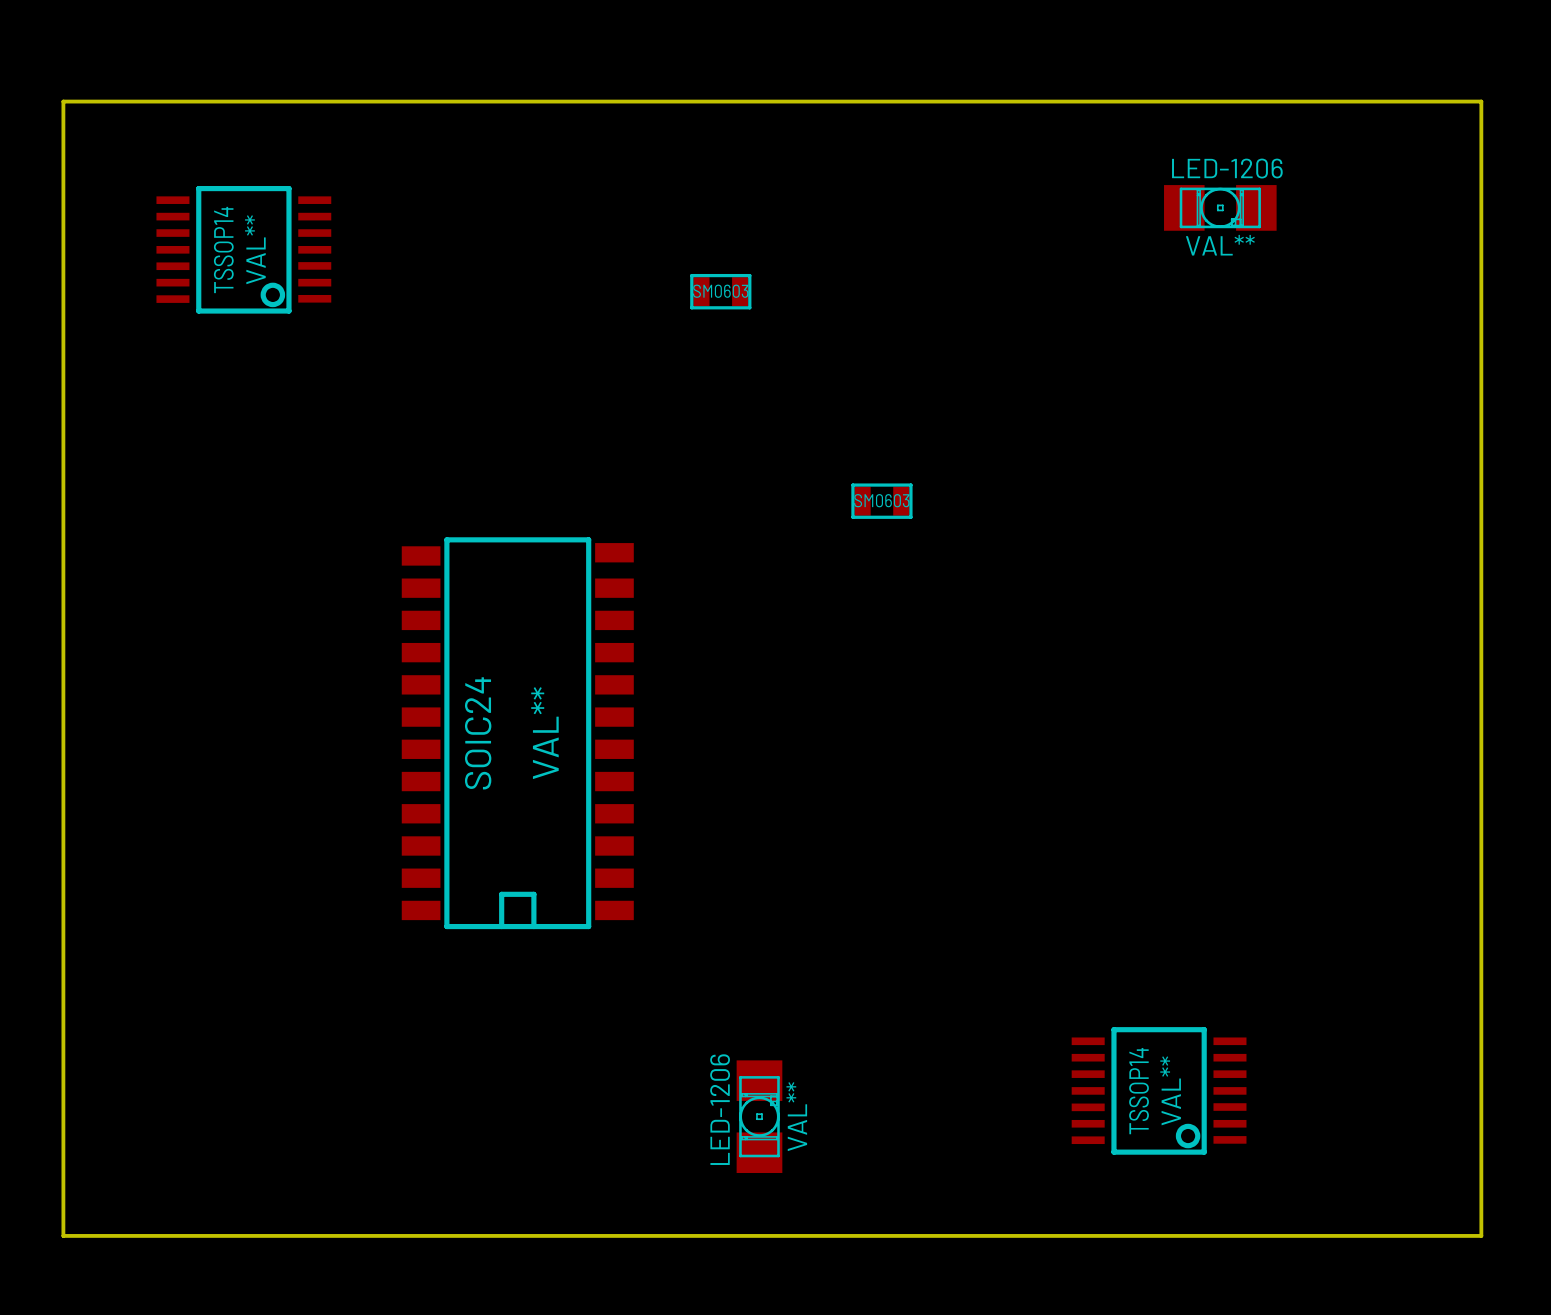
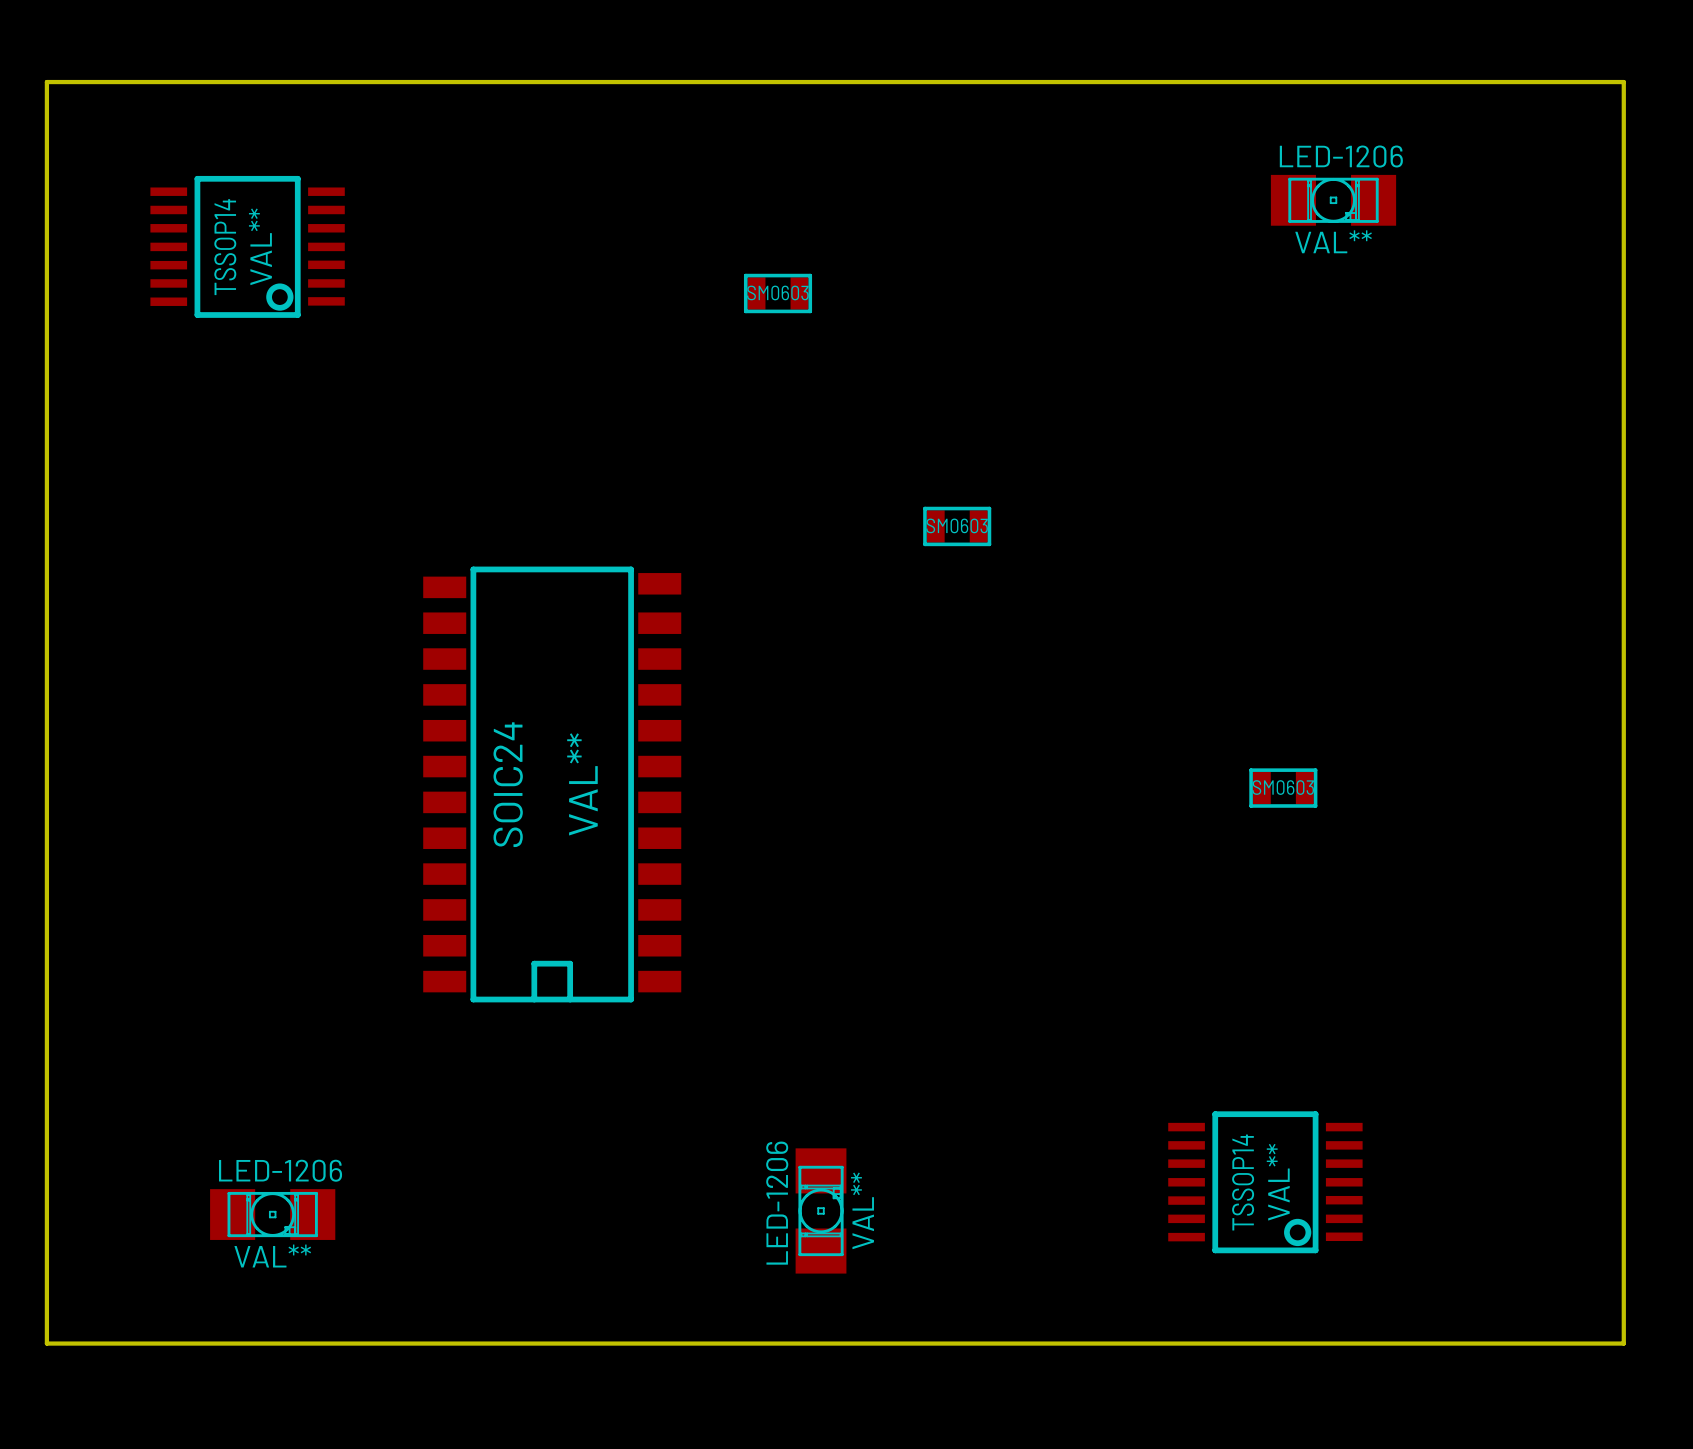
SM0603: none -> (1283, 788)
LED-1206: none -> VAL** (272, 1214)

